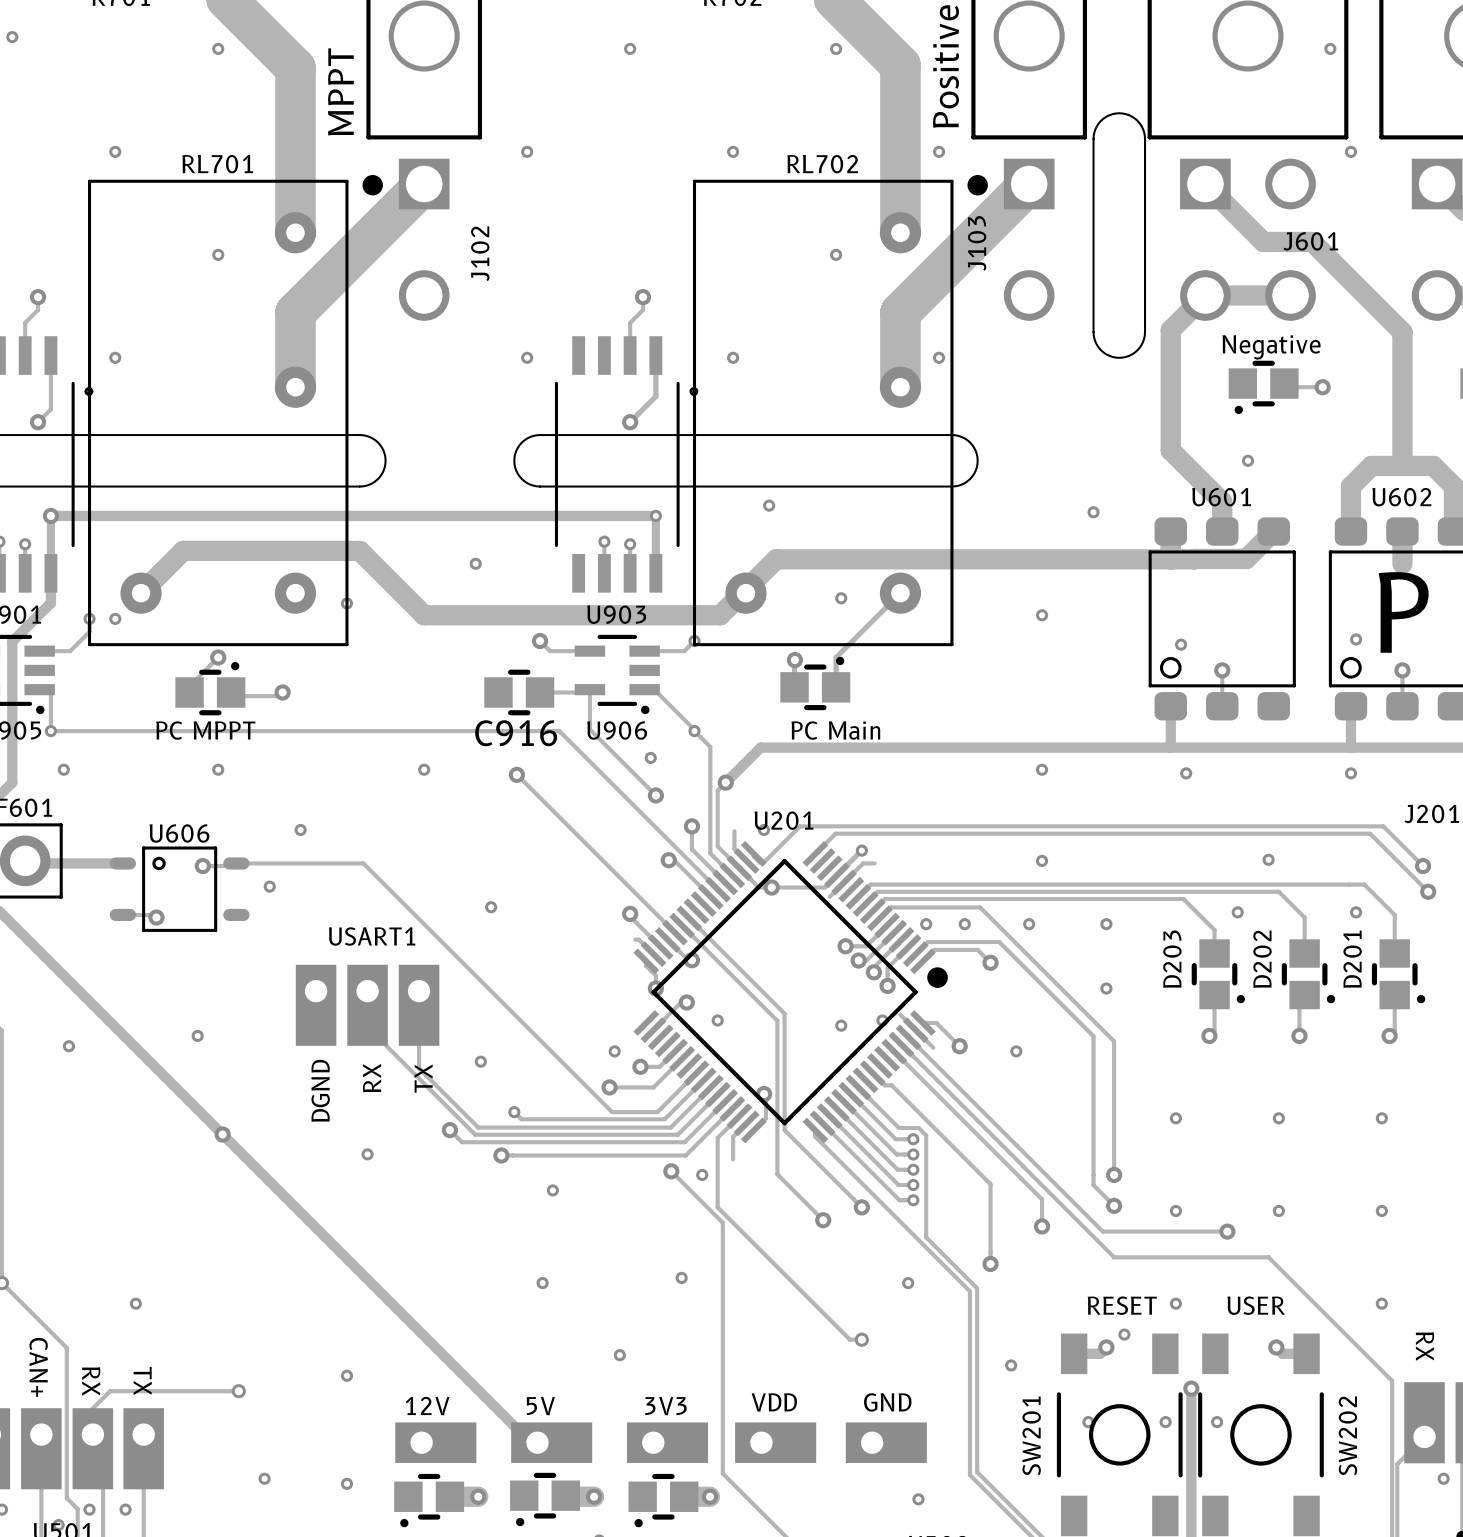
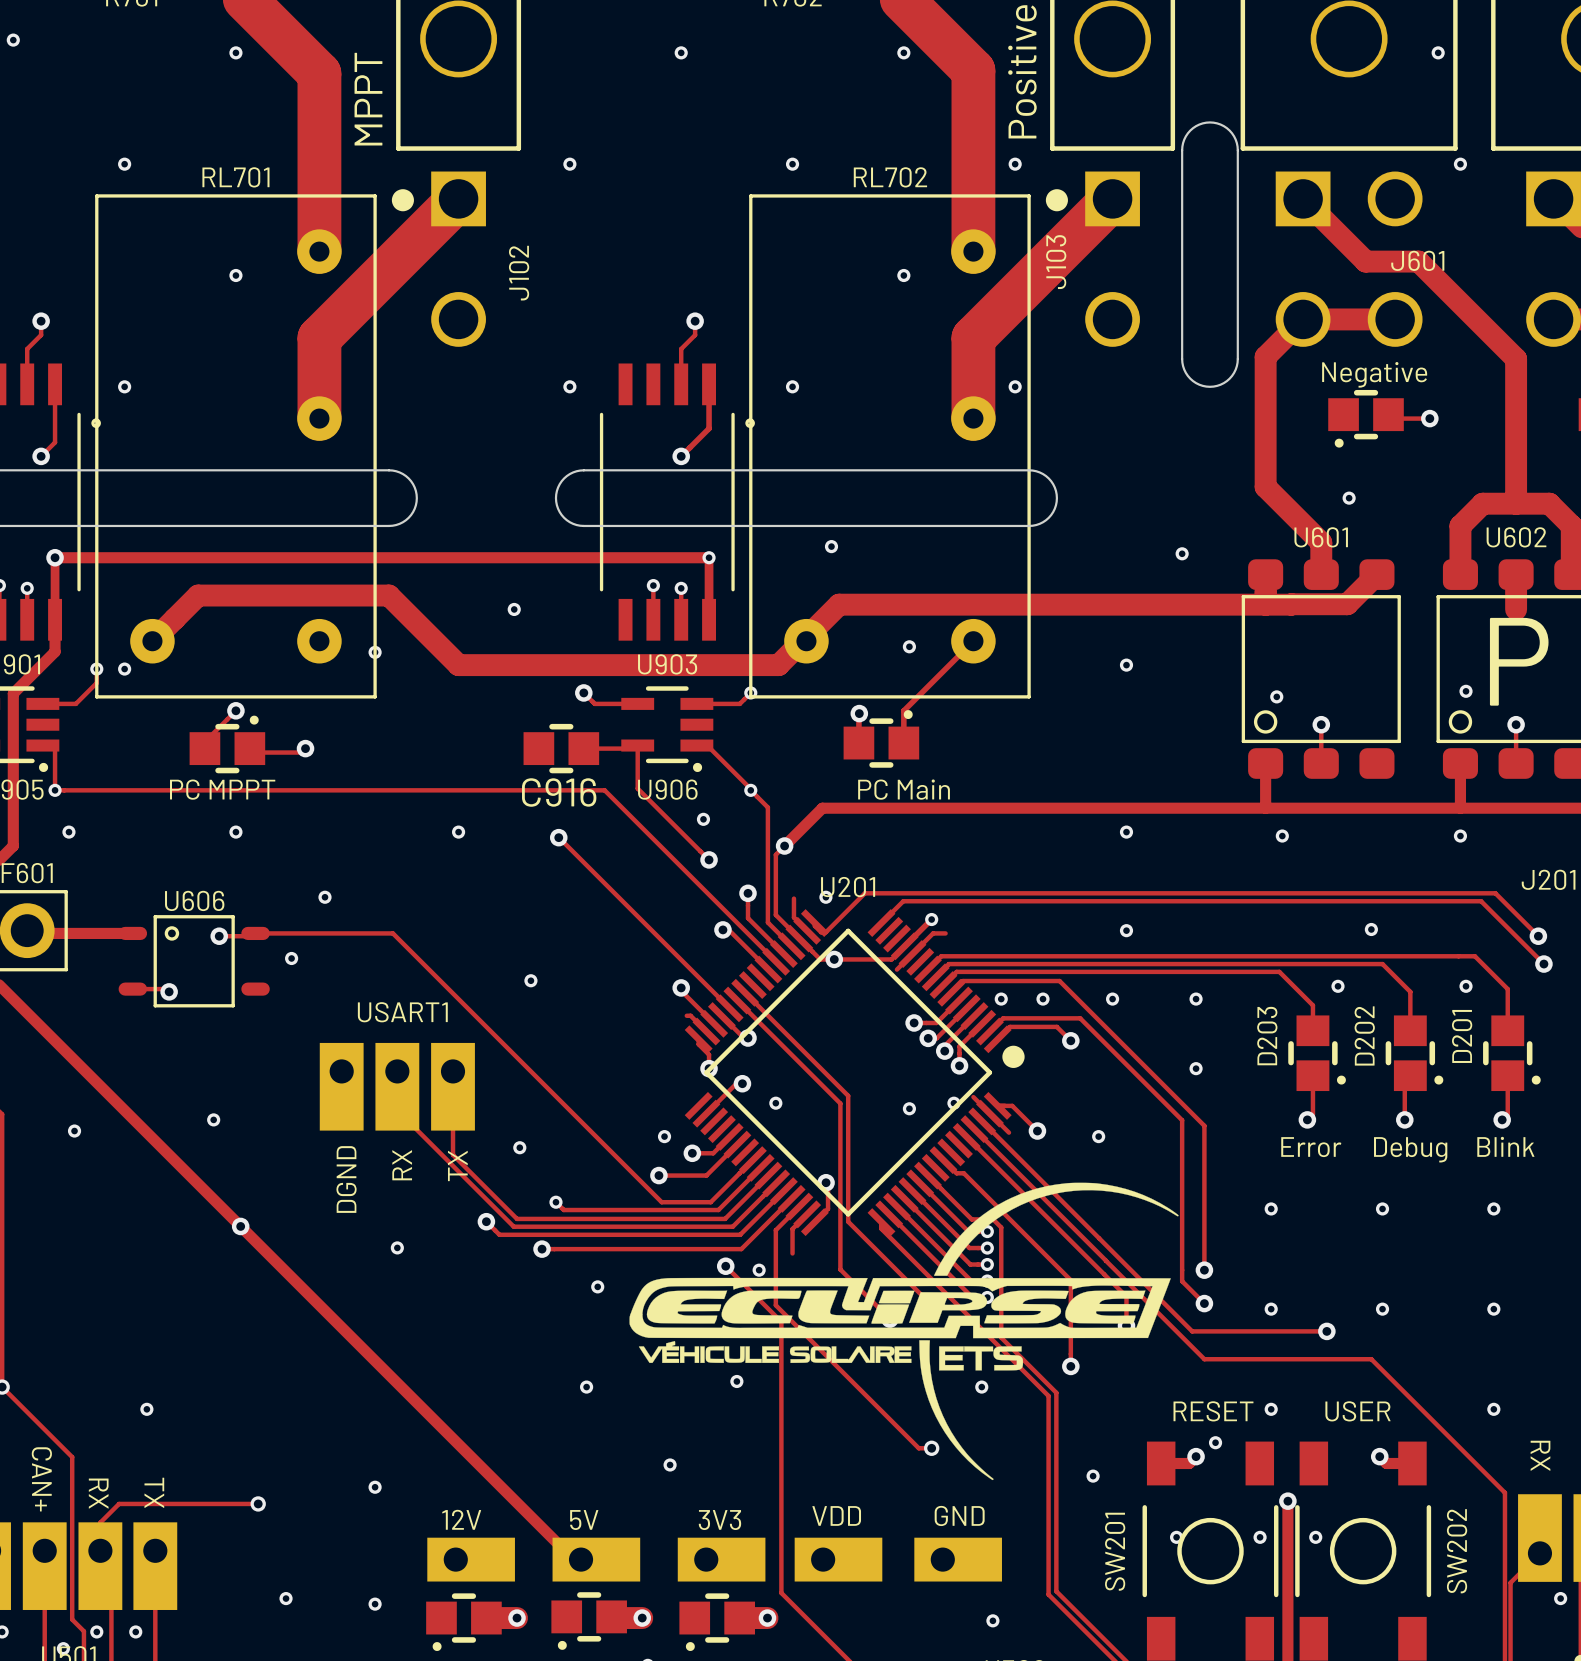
text: none -> Blink (1505, 1146)
text: none -> Error (1311, 1147)
text: none -> Debug (1410, 1149)
drawing: none -> [629, 1182, 1179, 1481]

